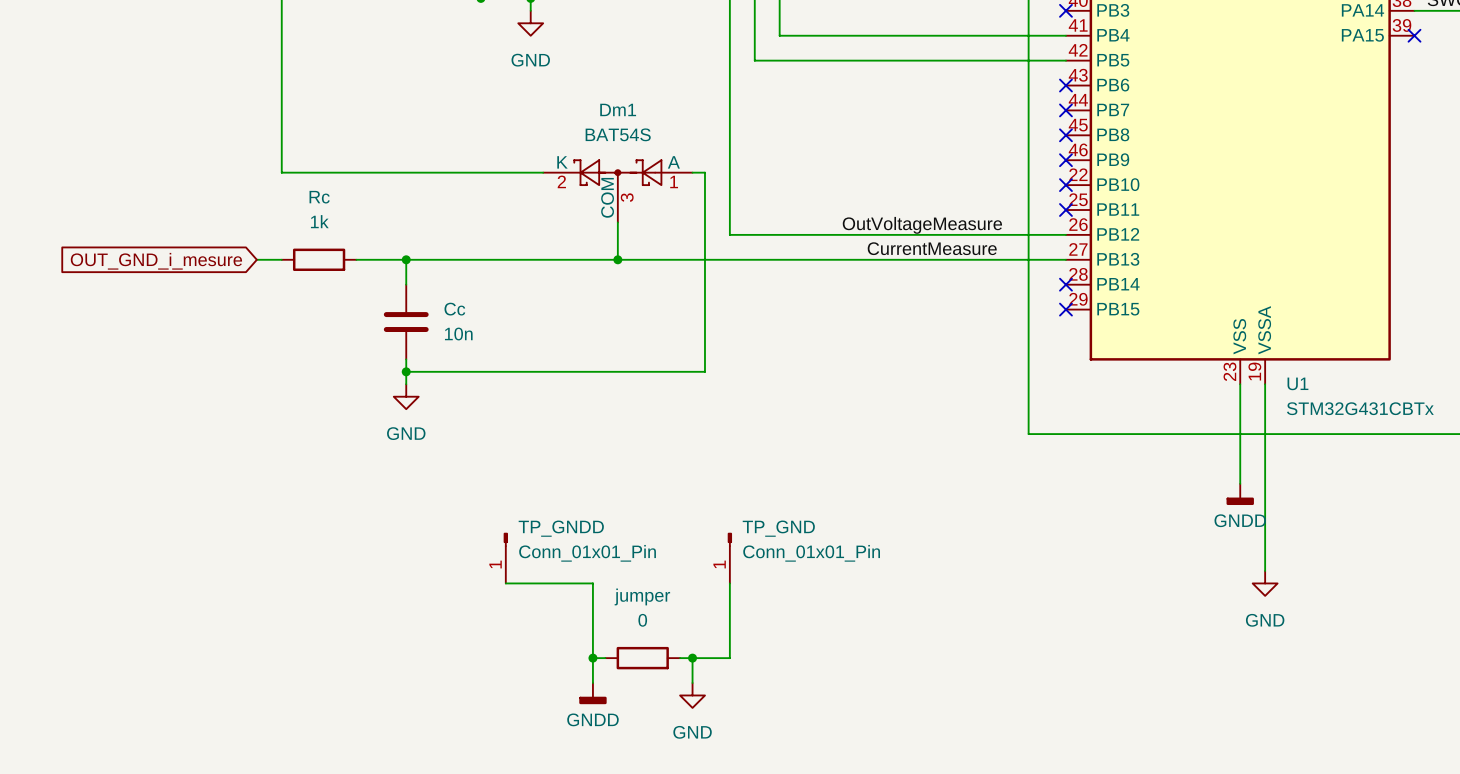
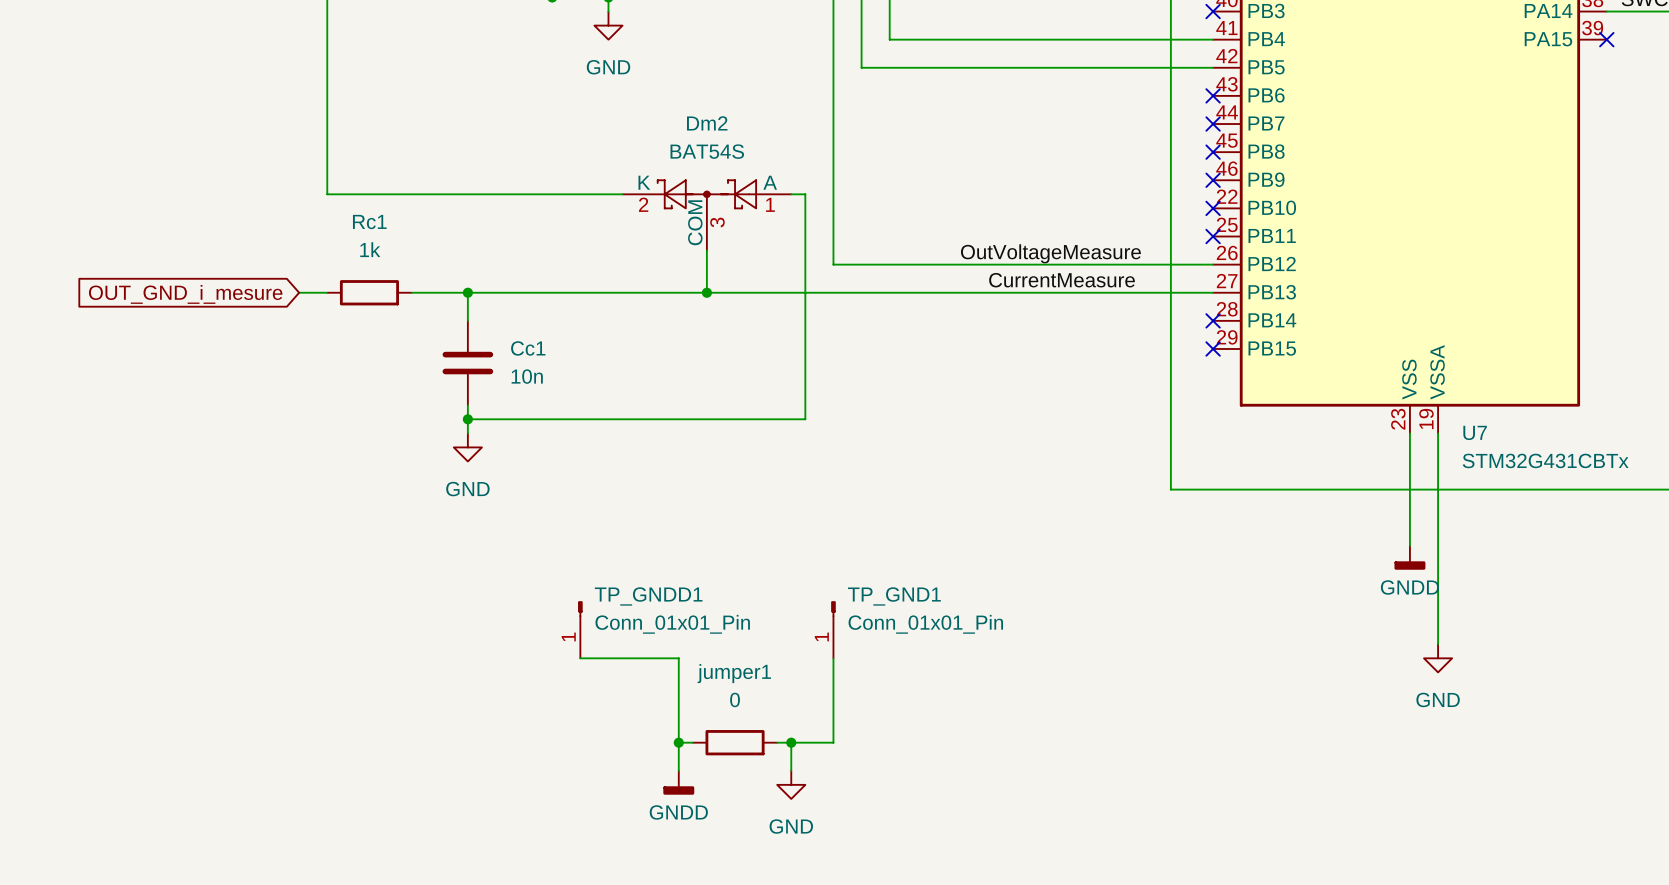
Dm1 name: Dm1 (618, 109) -> Dm2 (707, 123)
Rc name: Rc (319, 197) -> Rc1 (369, 222)
Cc name: Cc (454, 309) -> Cc1 (528, 348)
U1 name: U1 (1297, 383) -> U7 (1475, 432)
TP_GNDD name: TP_GNDD (561, 528) -> TP_GNDD1 (648, 596)
TP_GND name: TP_GND (778, 528) -> TP_GND1 (894, 596)
jumper name: jumper (642, 596) -> jumper1 (734, 673)

